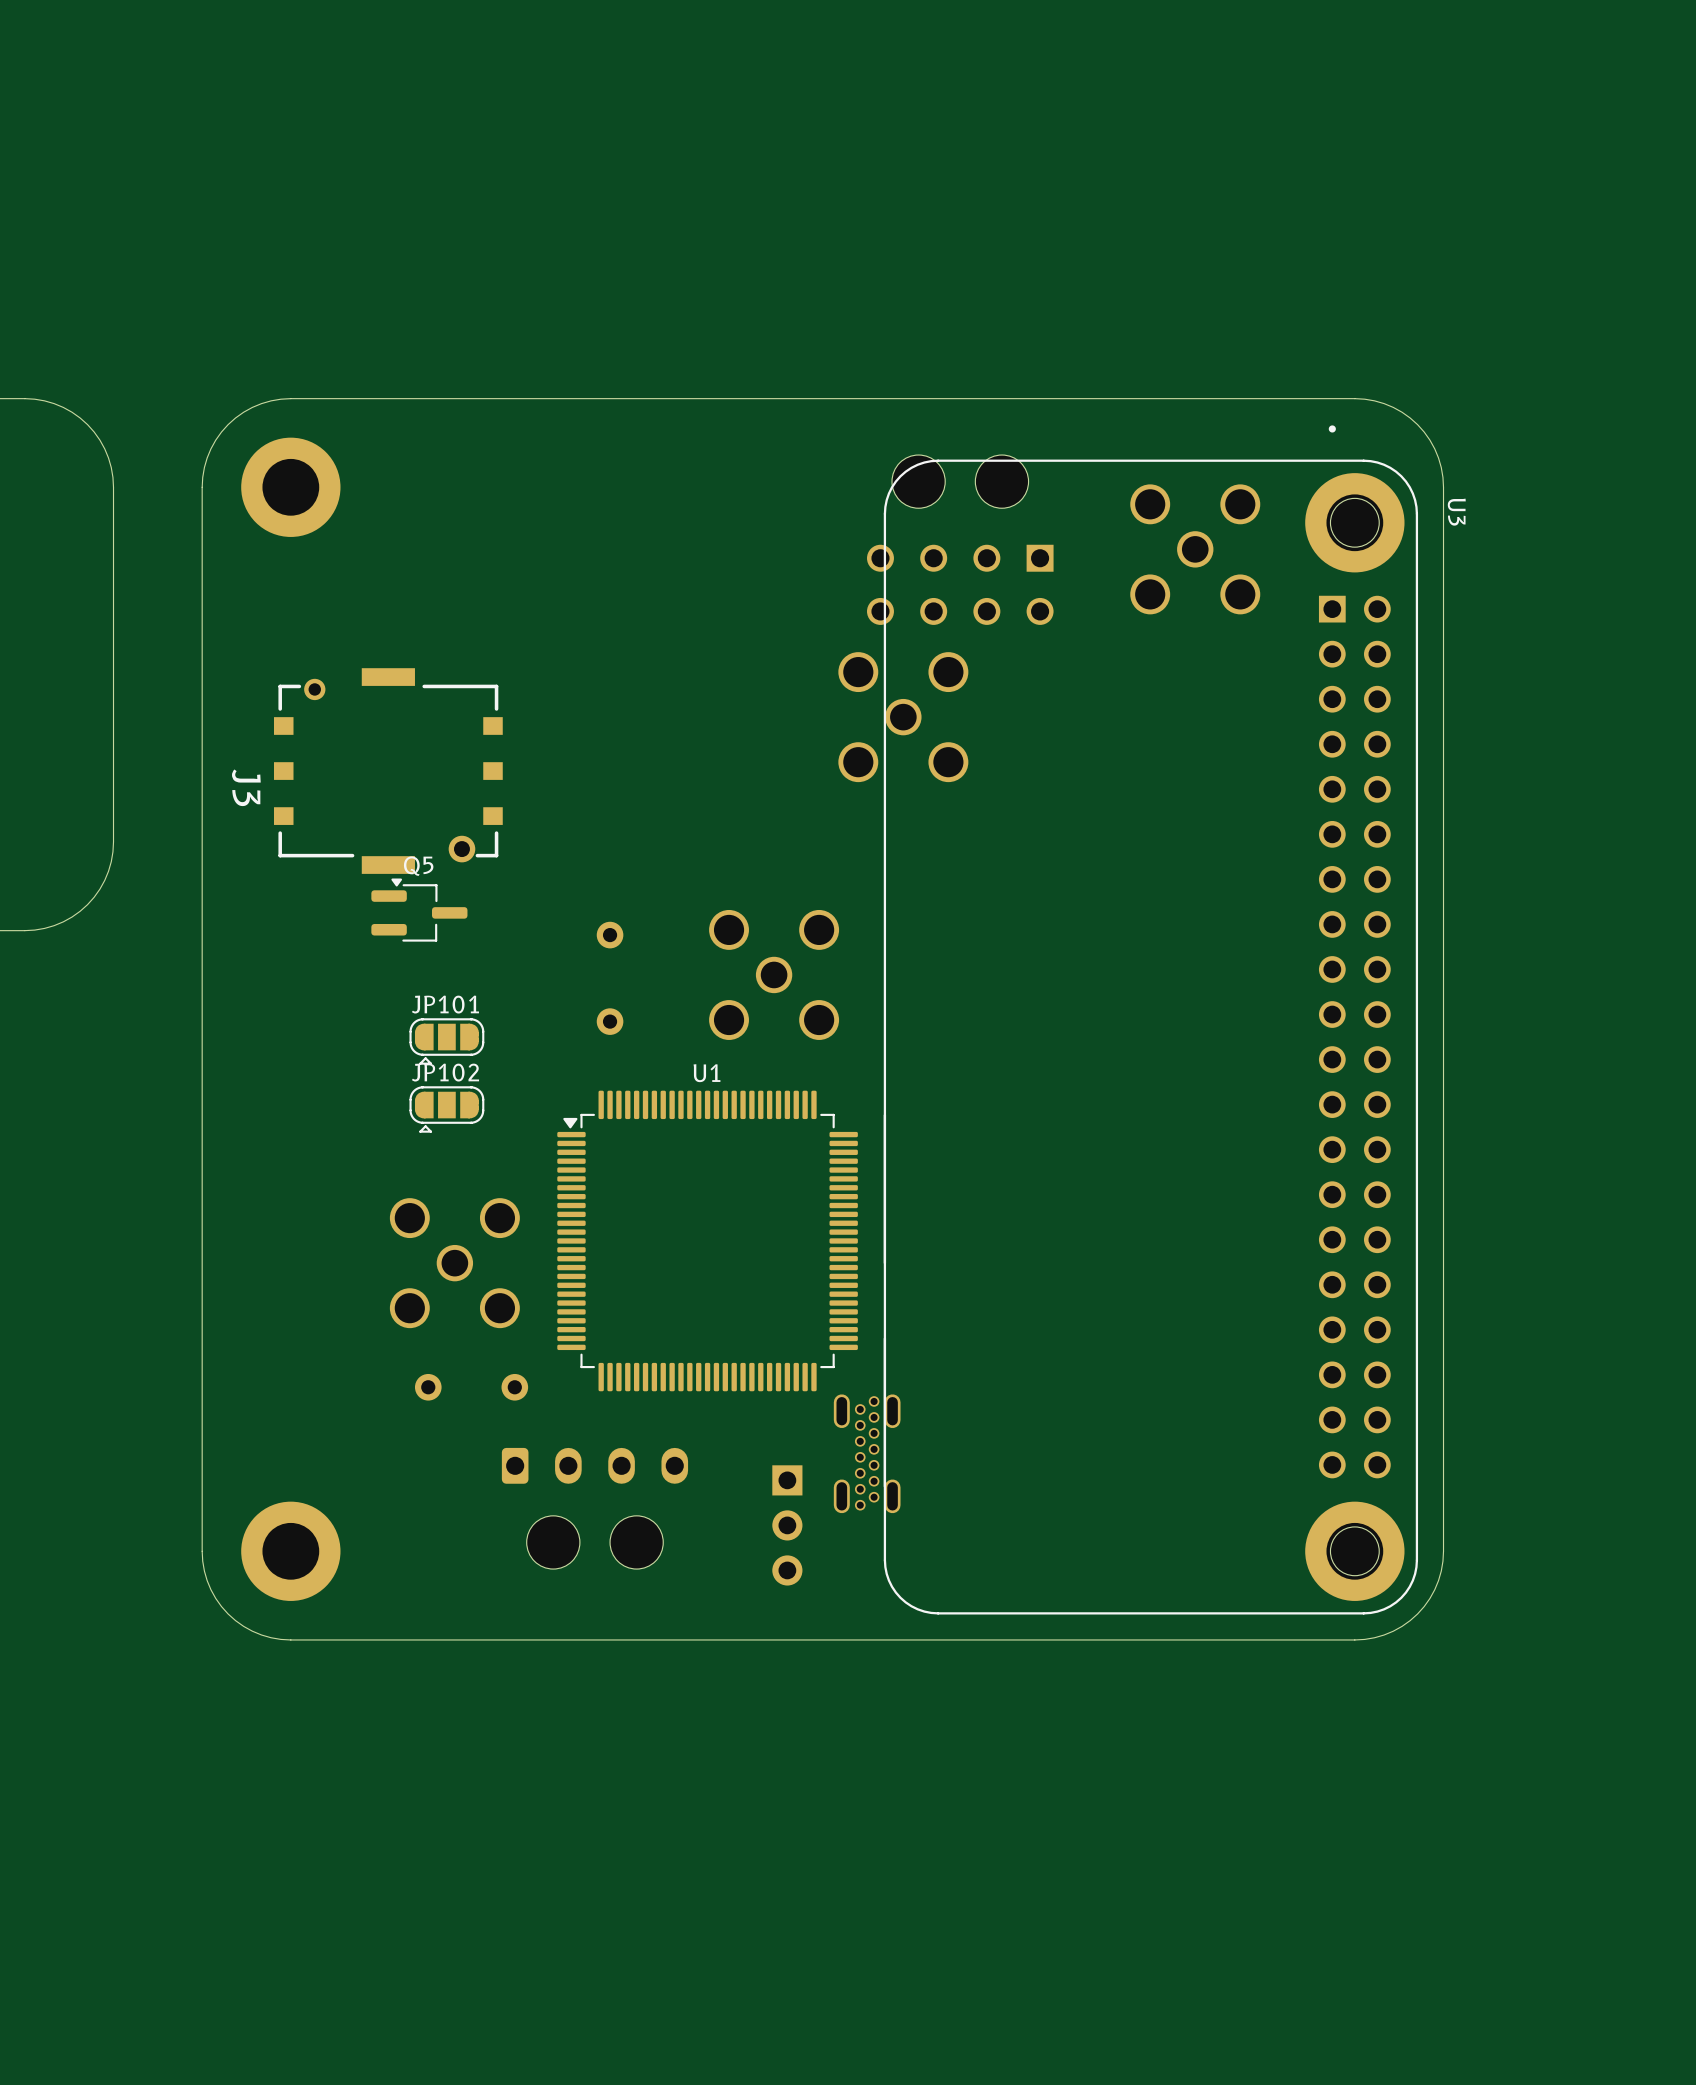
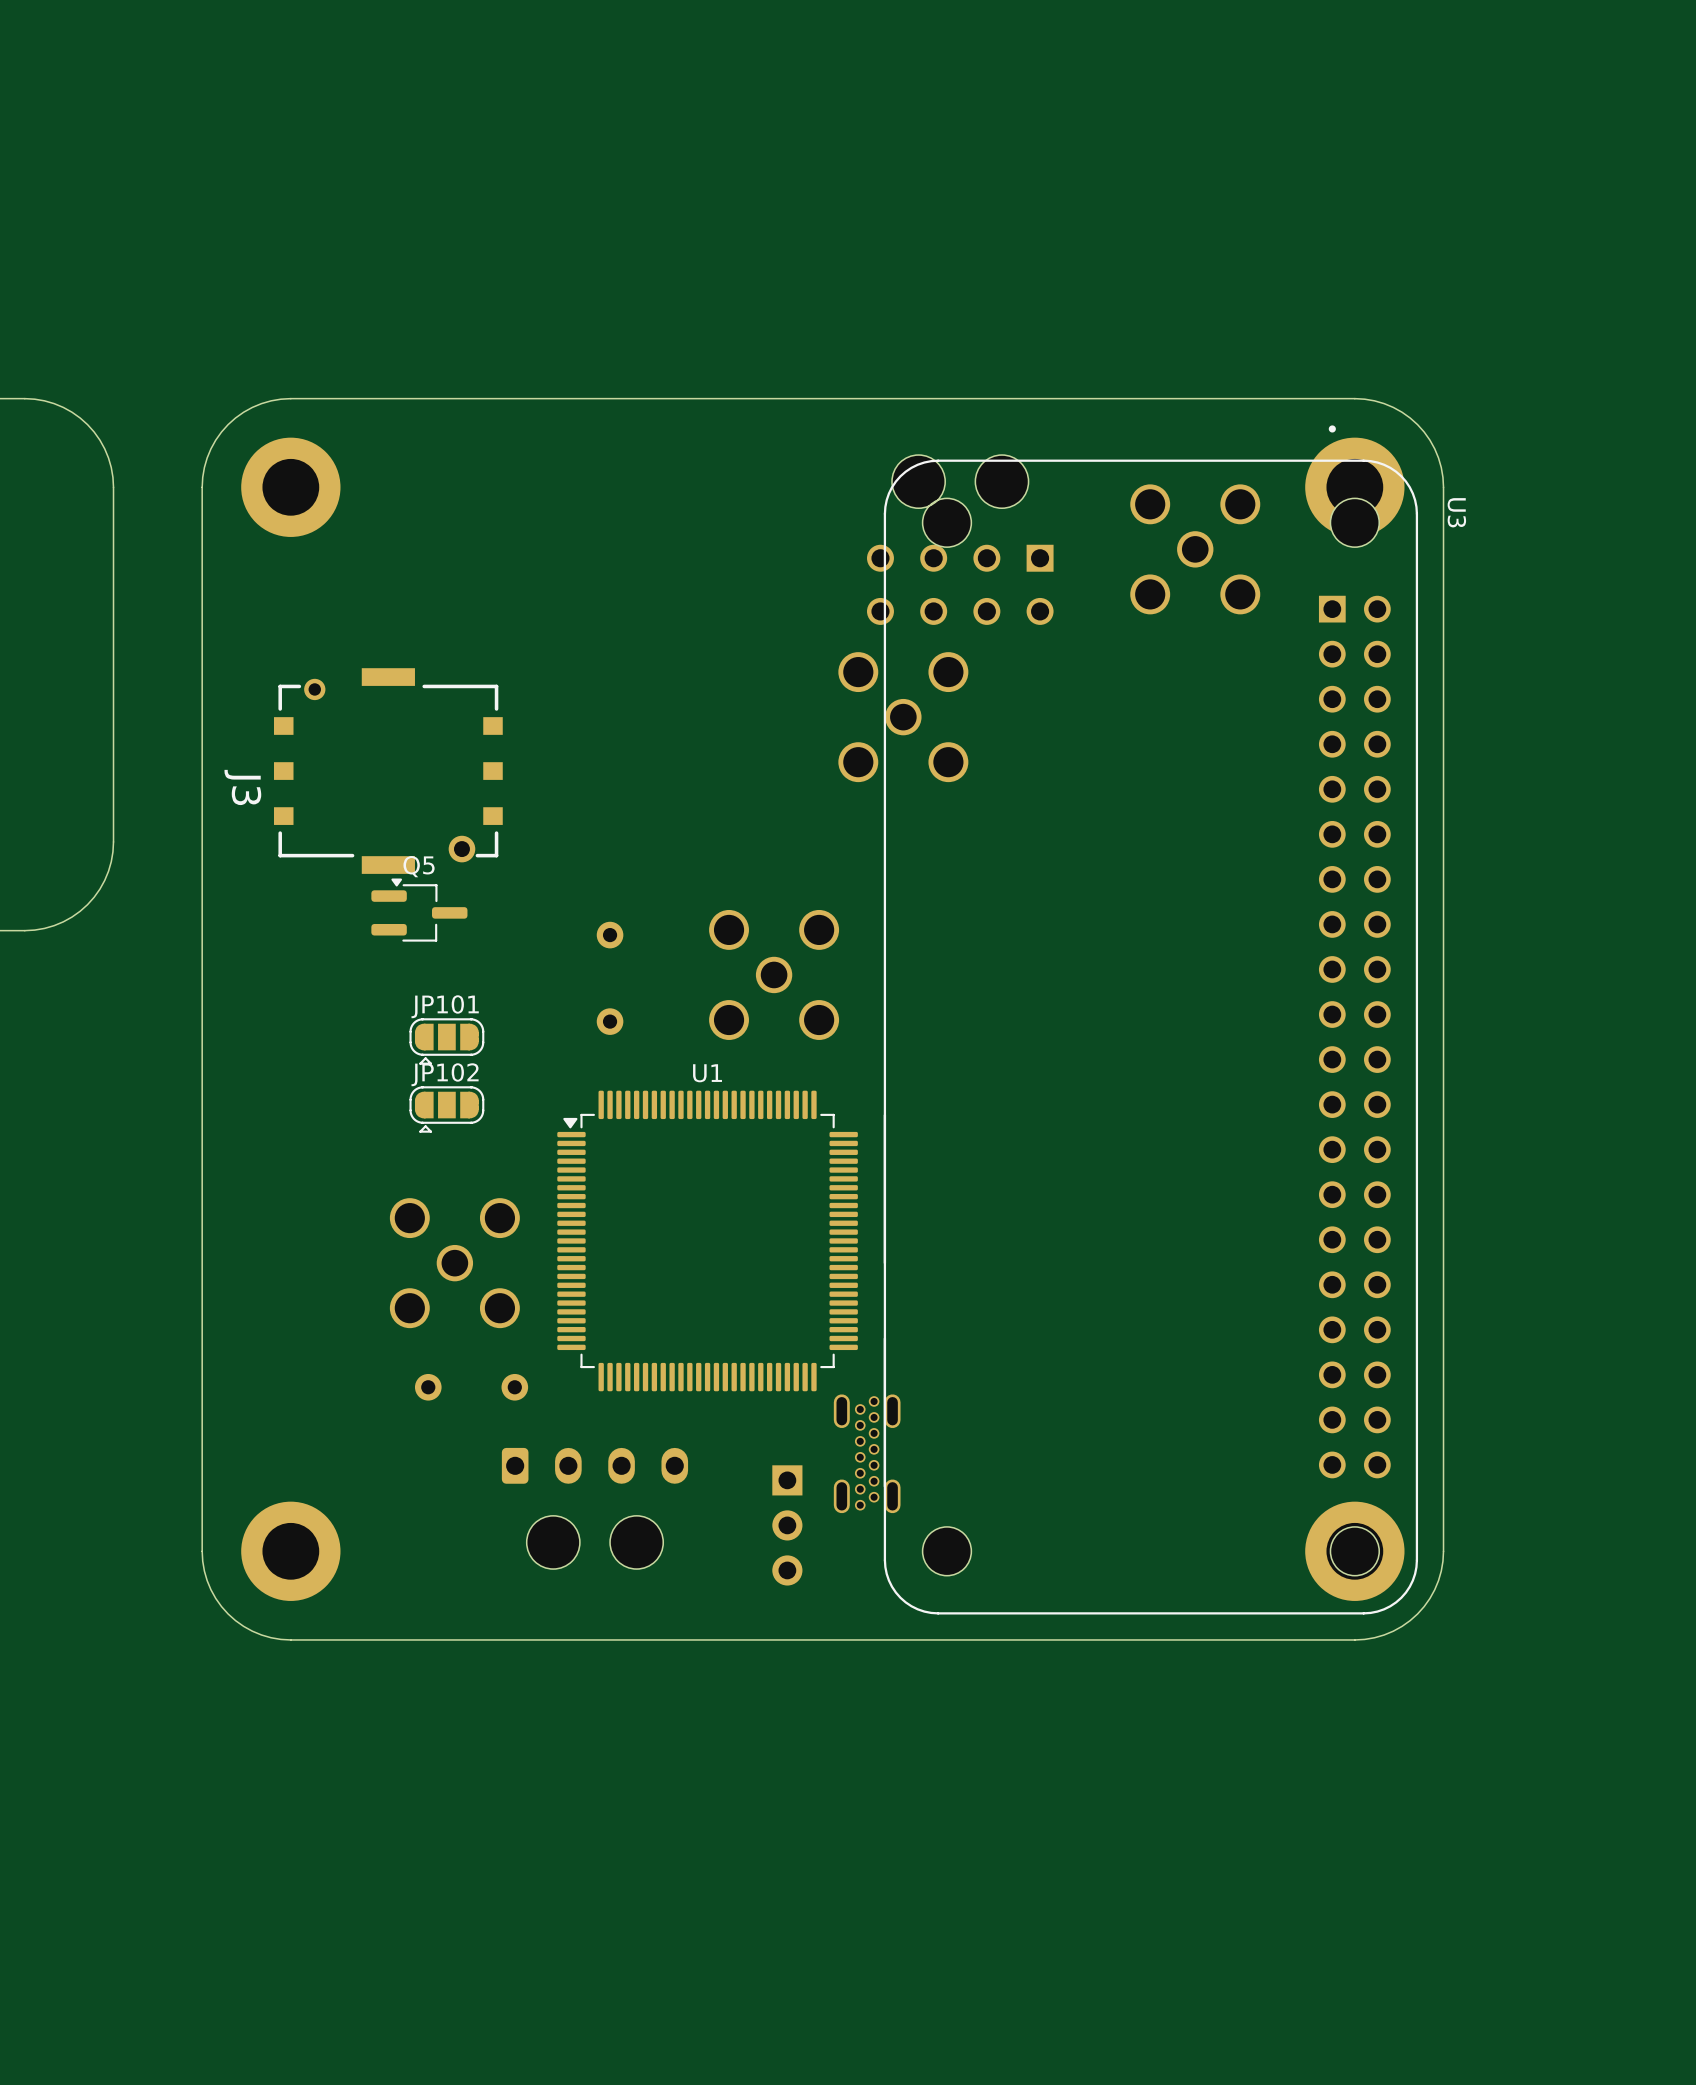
U3 footprint: [883, 425, 1419, 1615] -> [883, 425, 1419, 1615]
part position: (1354, 522) -> (1354, 487)

